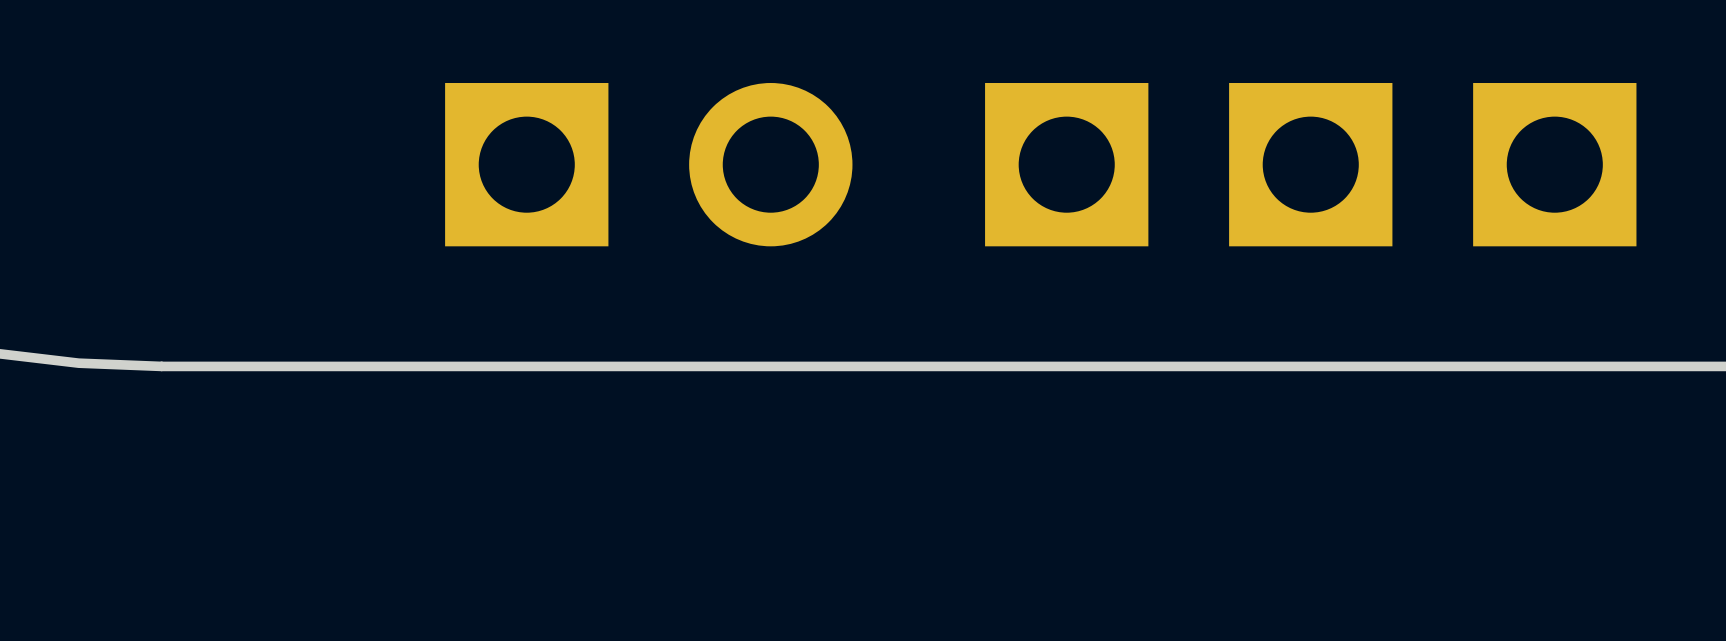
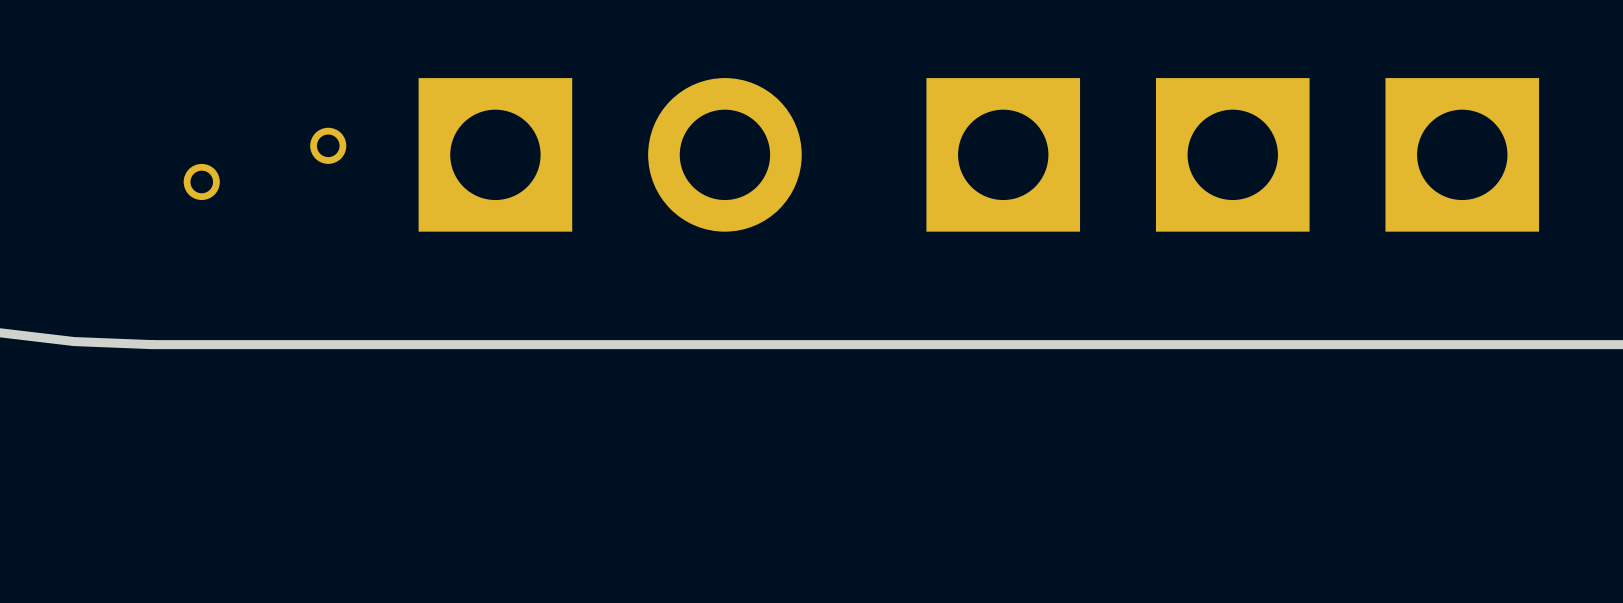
part: none -> (328, 145)
part: none -> (201, 181)

